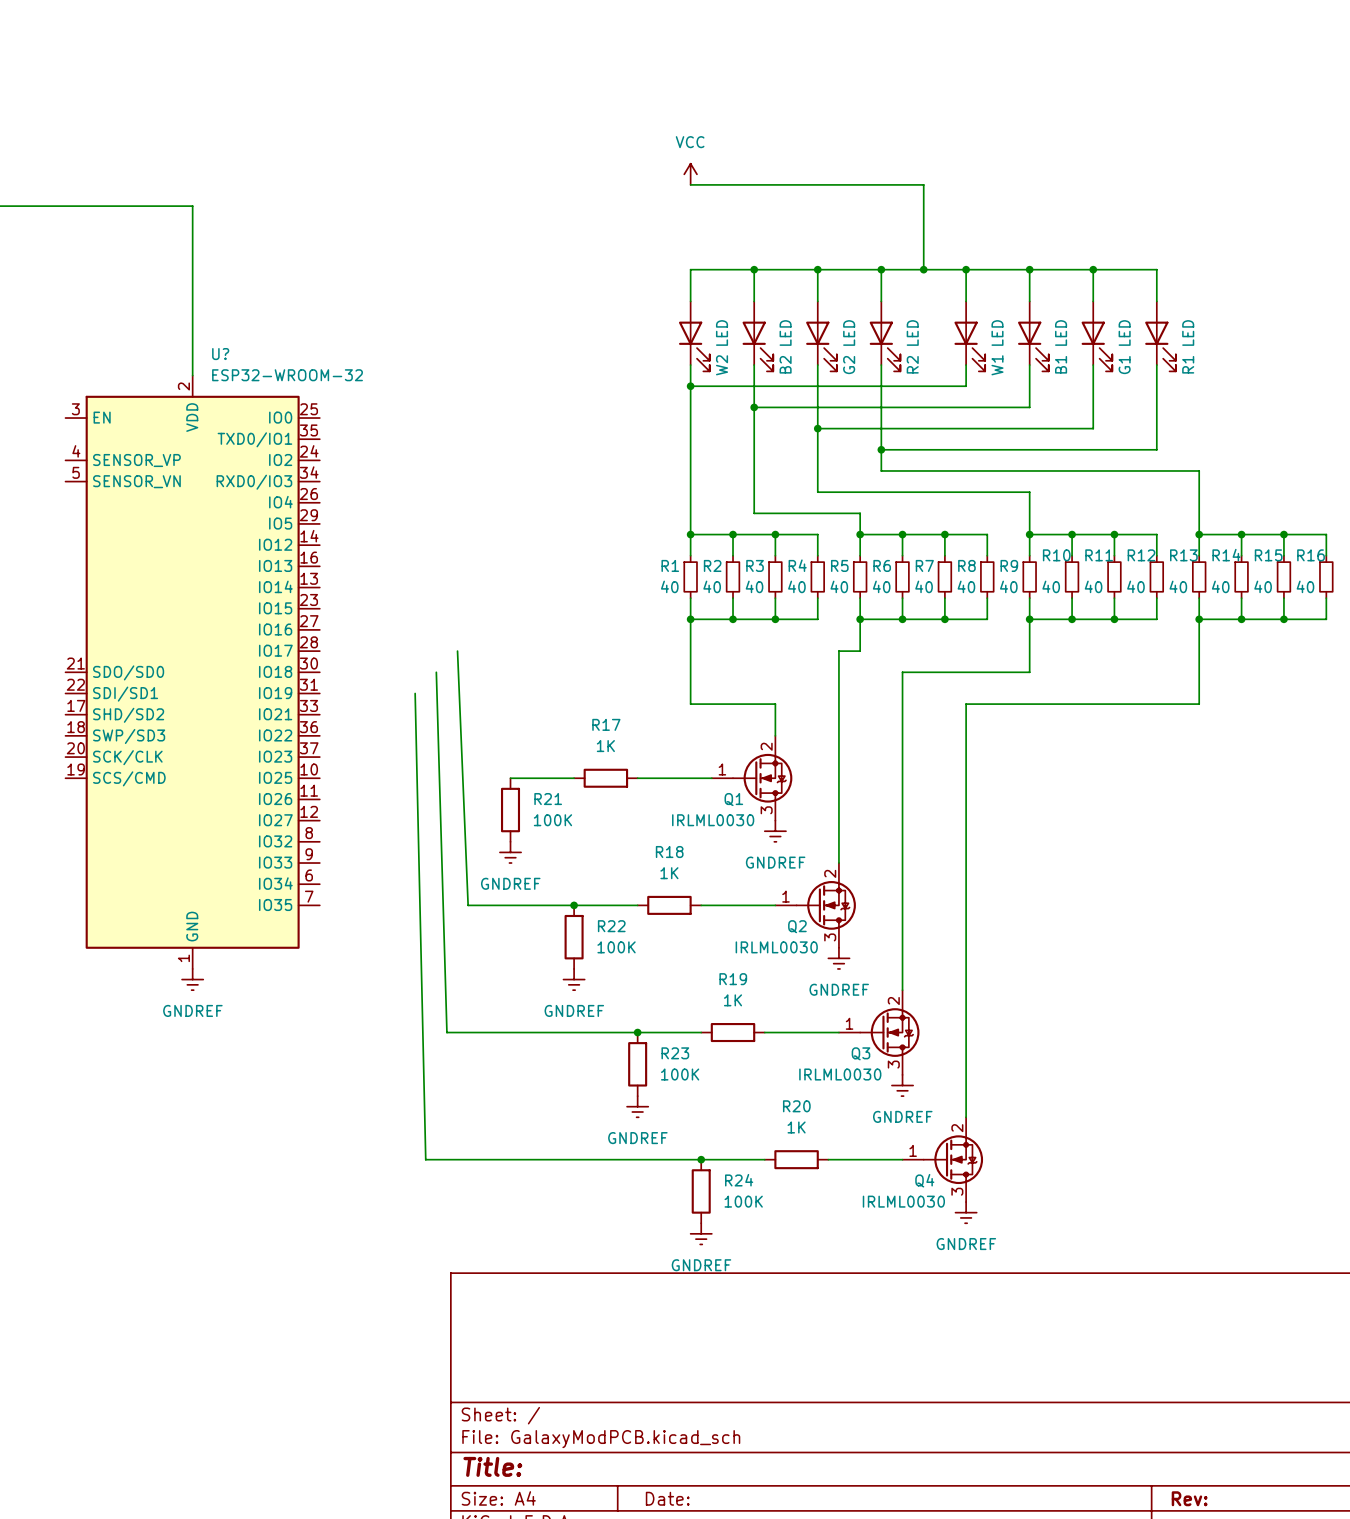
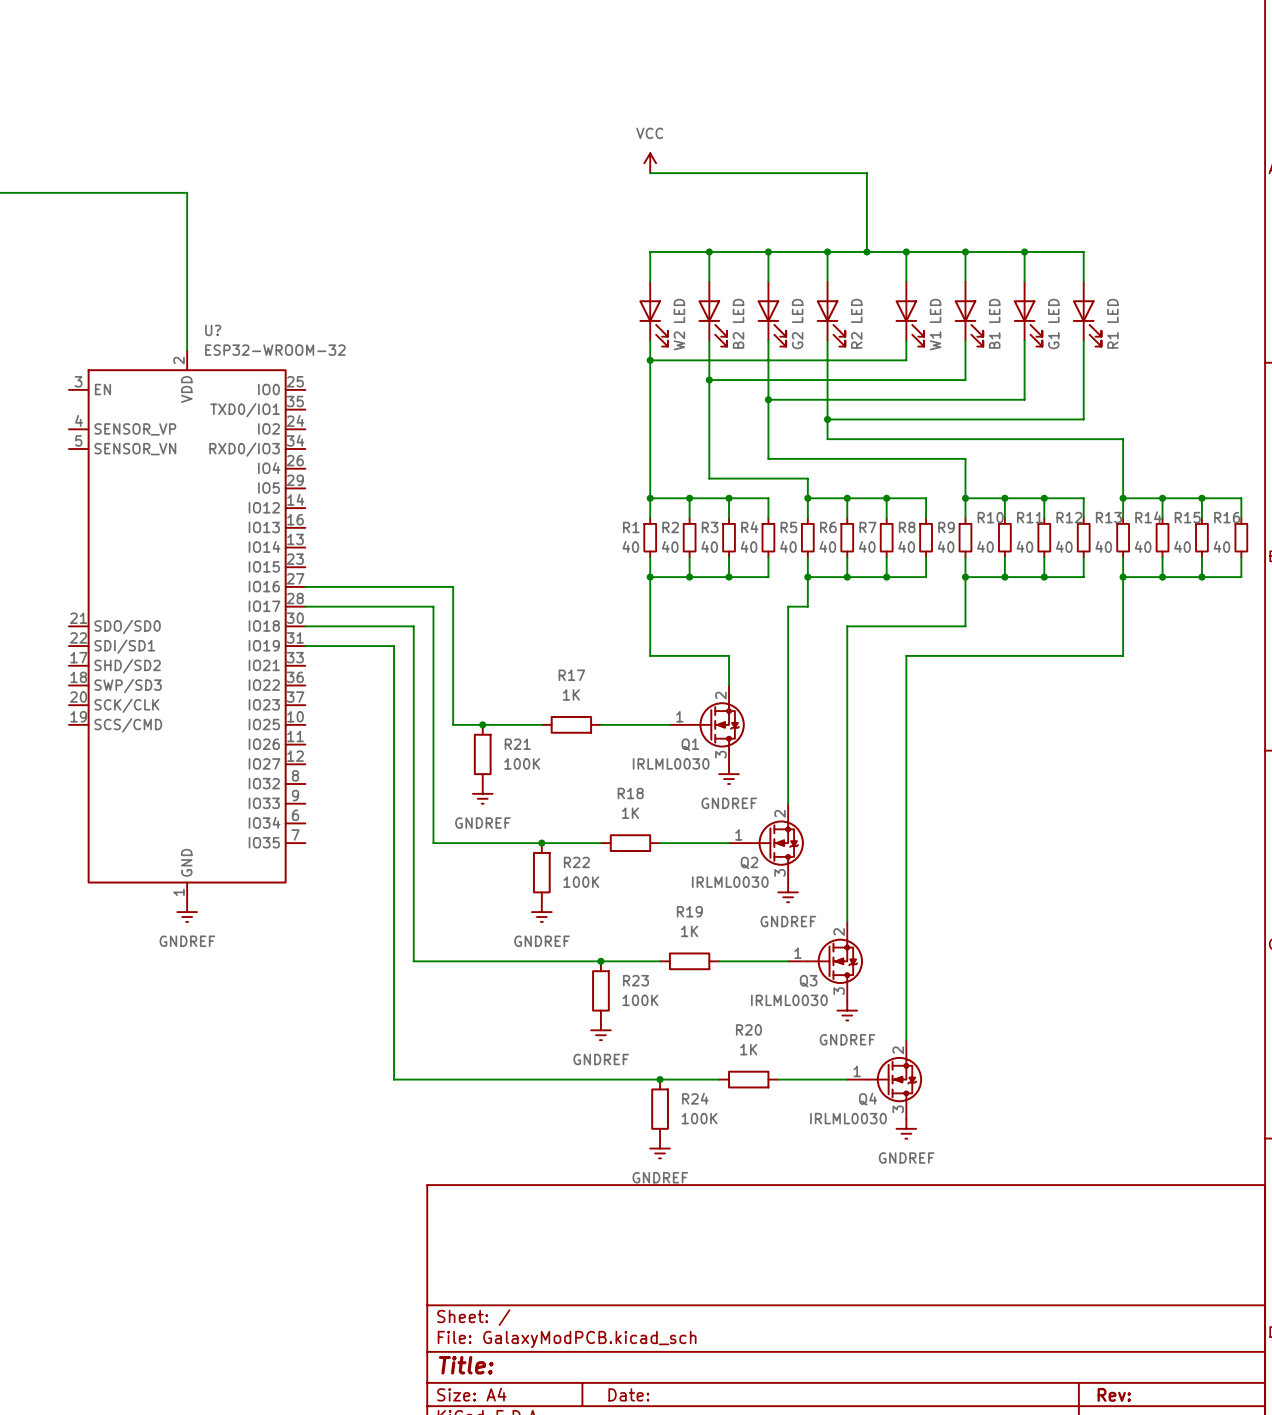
wire: none -> (305, 586) (453, 586) (453, 724) (482, 724)
wire: (457, 651) (468, 905) -> (305, 606) (433, 606) (433, 843) (443, 843)
wire: (436, 672) (446, 1032) -> (305, 626) (413, 626) (413, 961) (423, 961)
wire: (415, 693) (425, 1159) -> (305, 646) (394, 646) (394, 1079) (403, 1079)
junction: none -> (482, 724)

